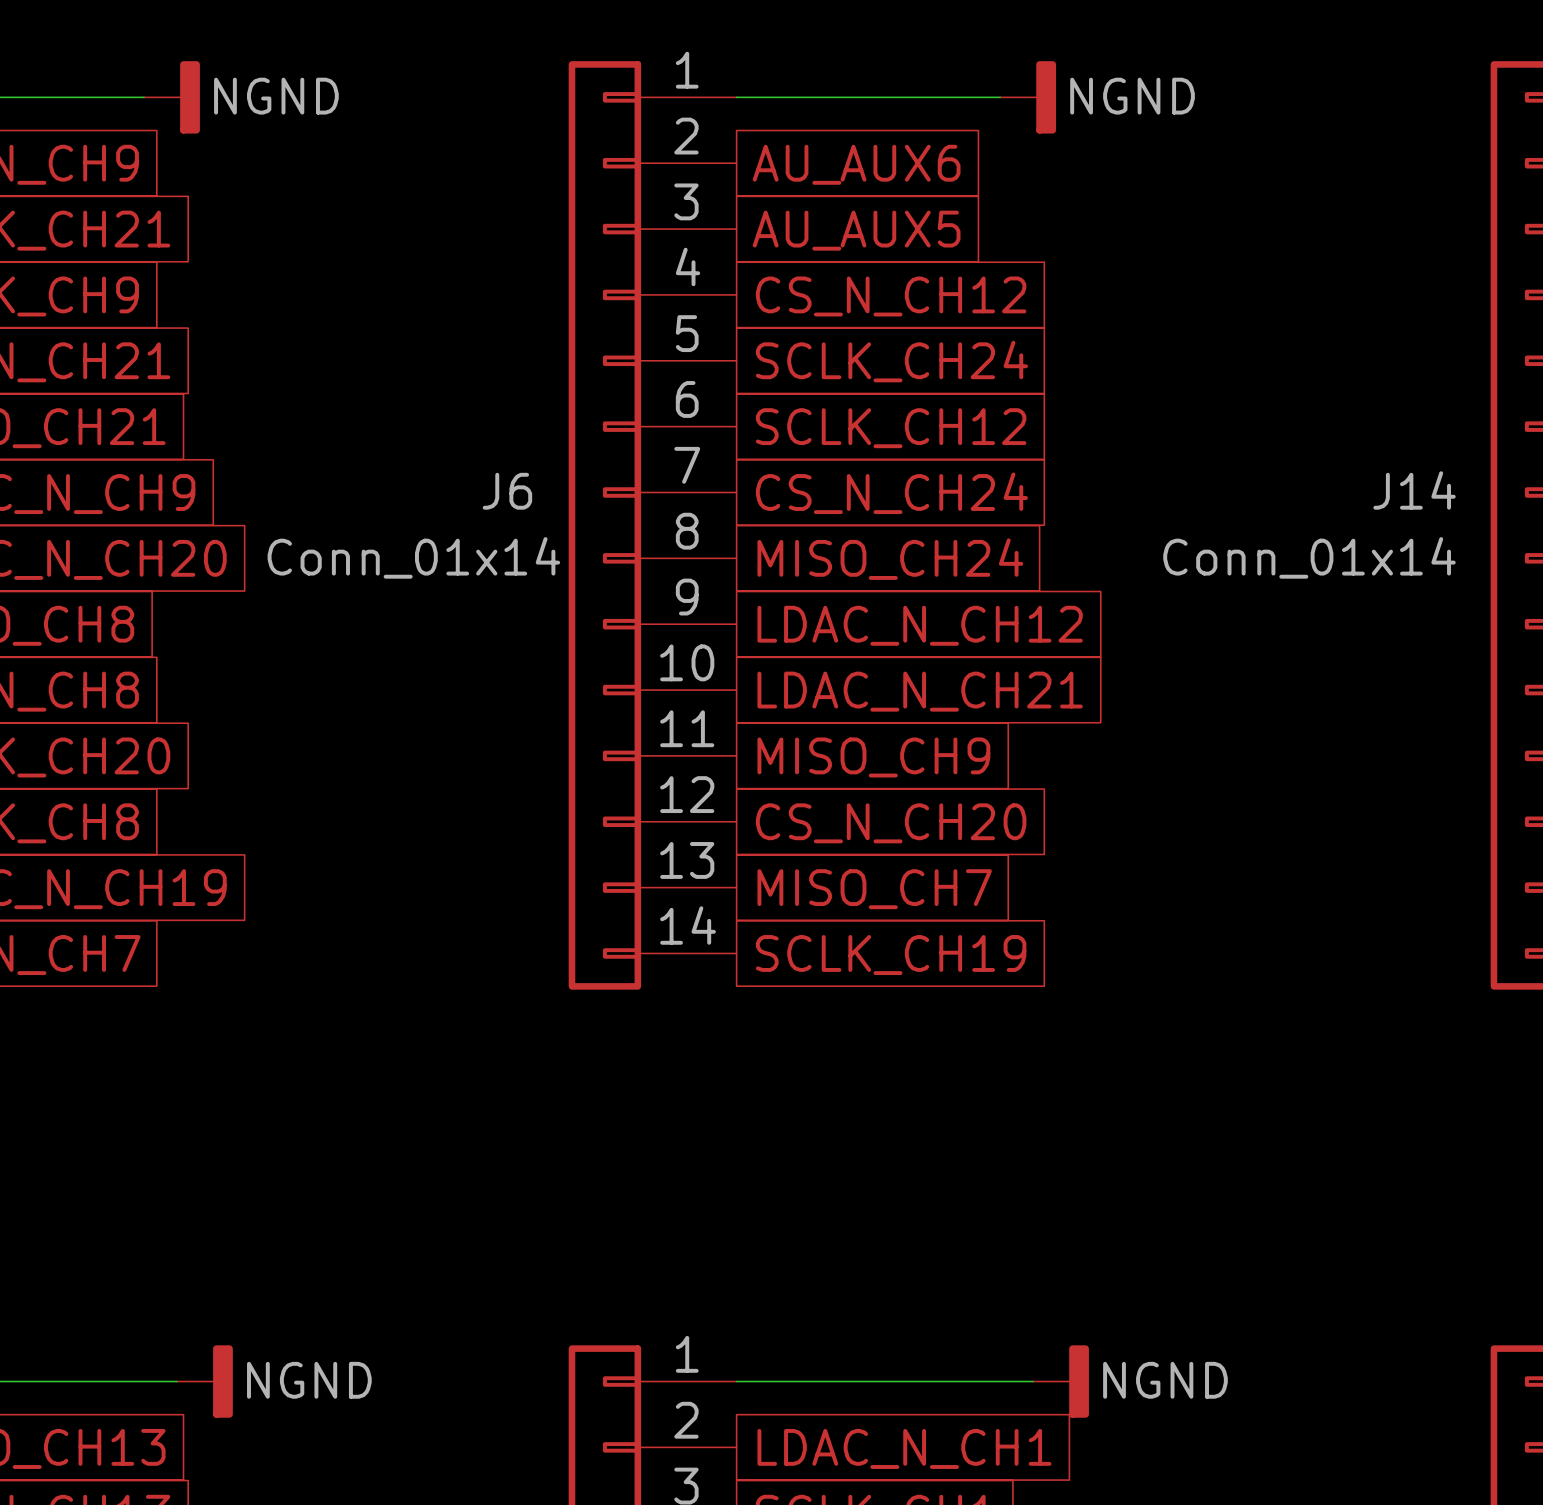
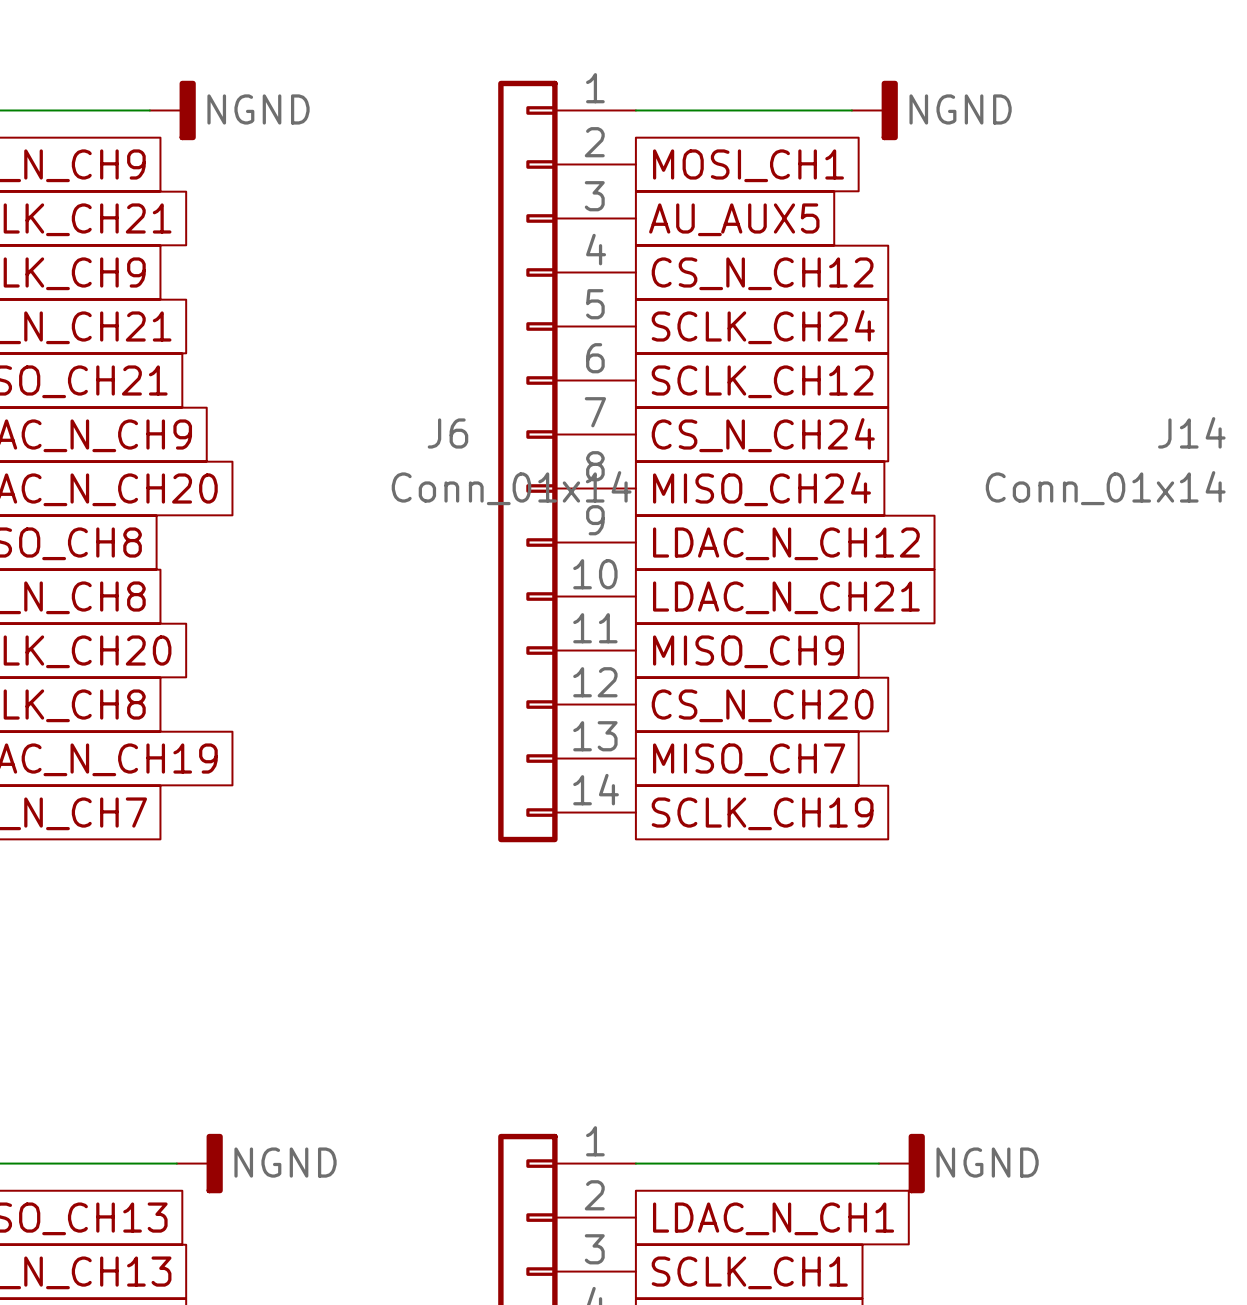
global label: AU_AUX6 (856, 164) -> MOSI_CH1 (748, 165)
J6 value position: Conn_01x14 (413, 557) -> Conn_01x14 (511, 488)

